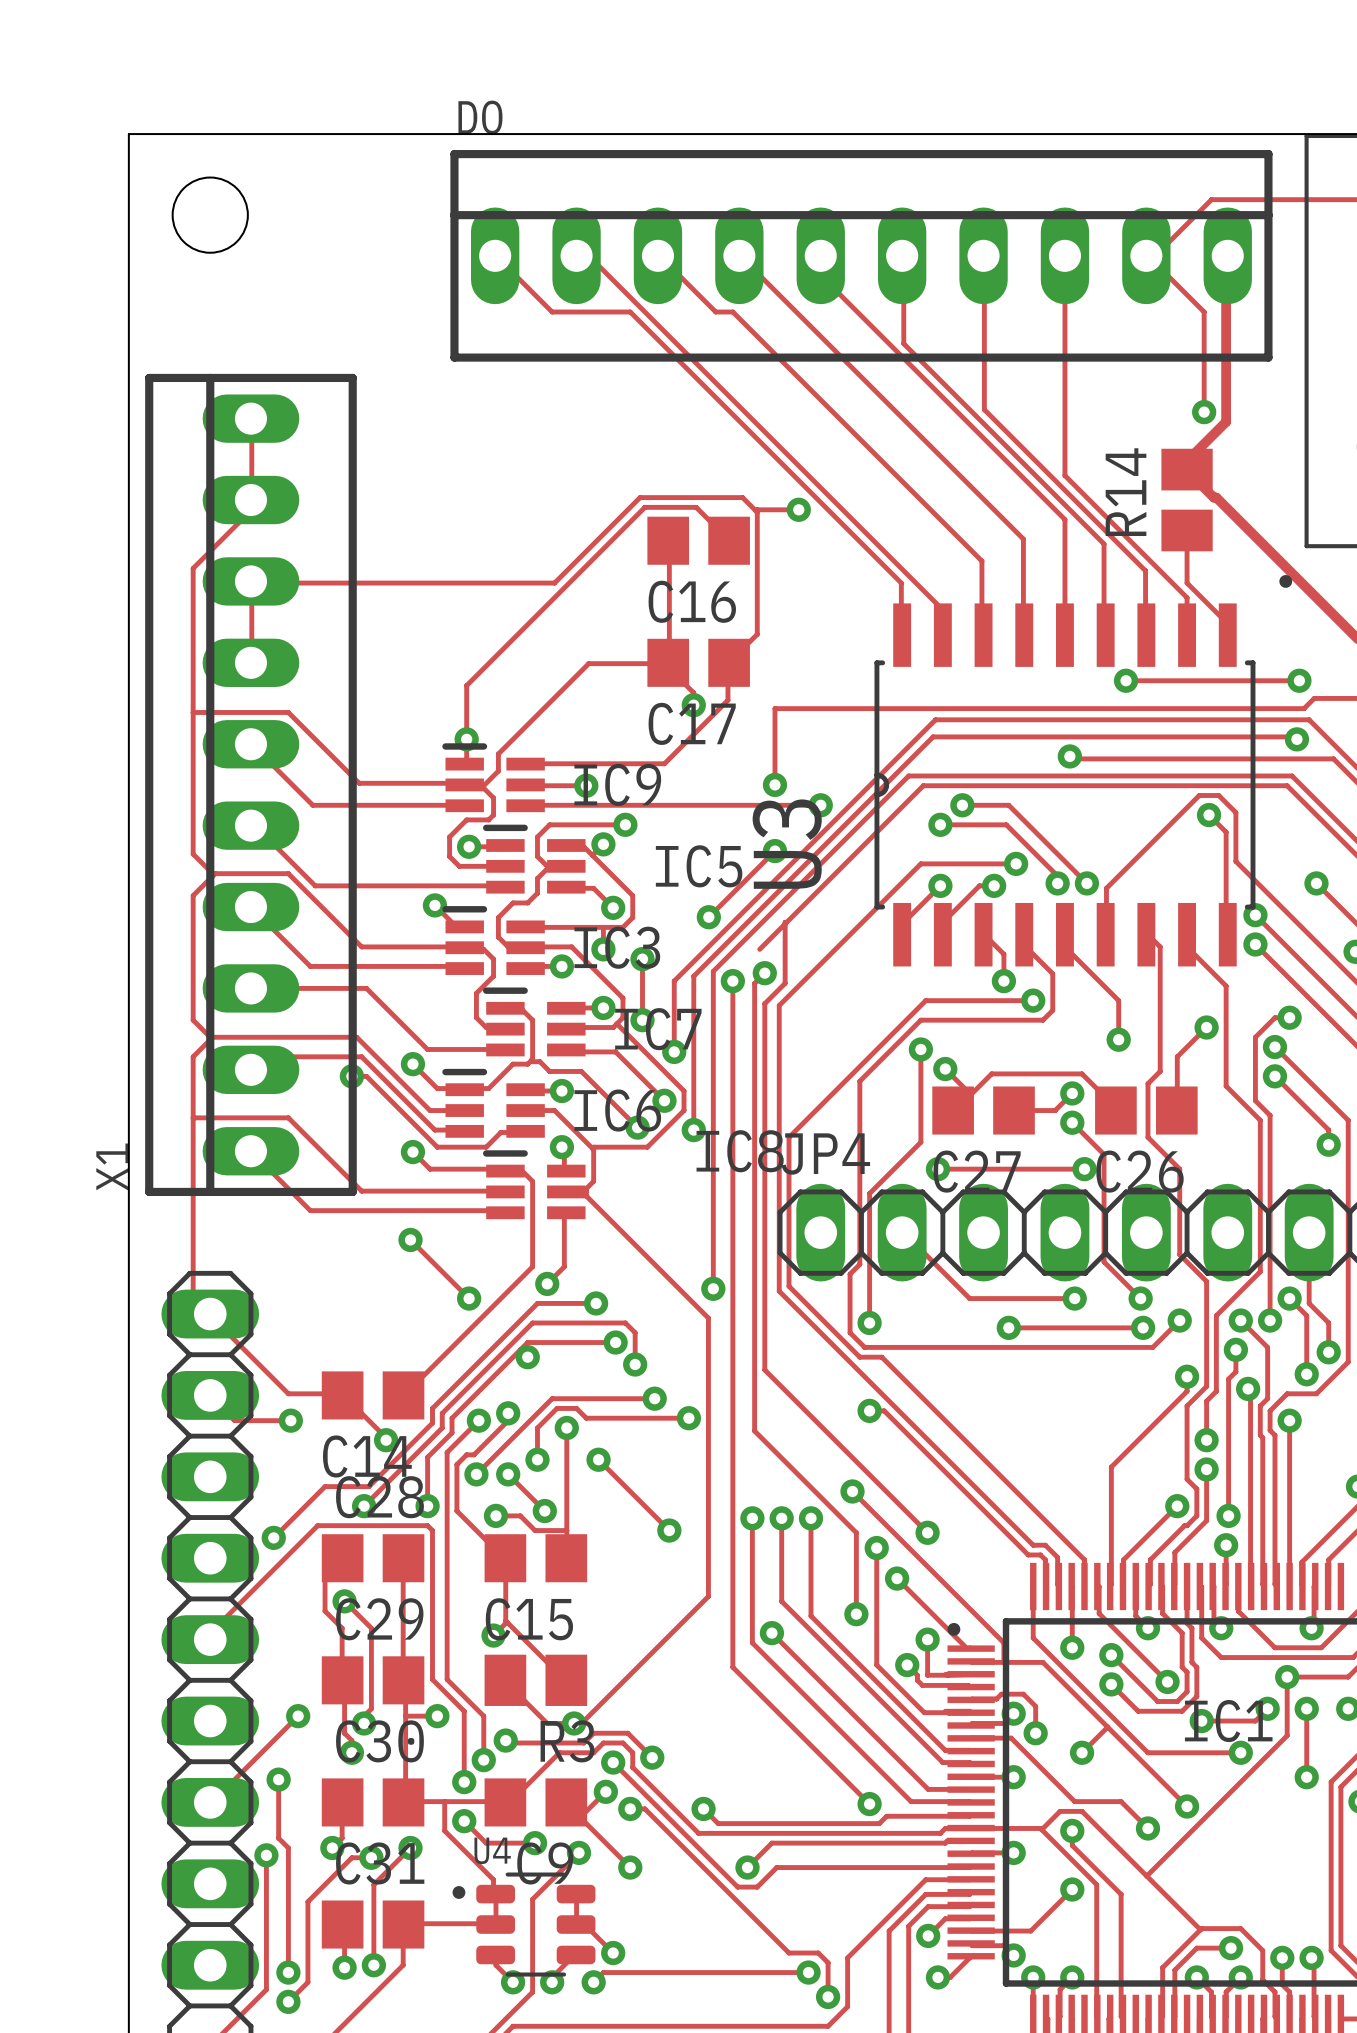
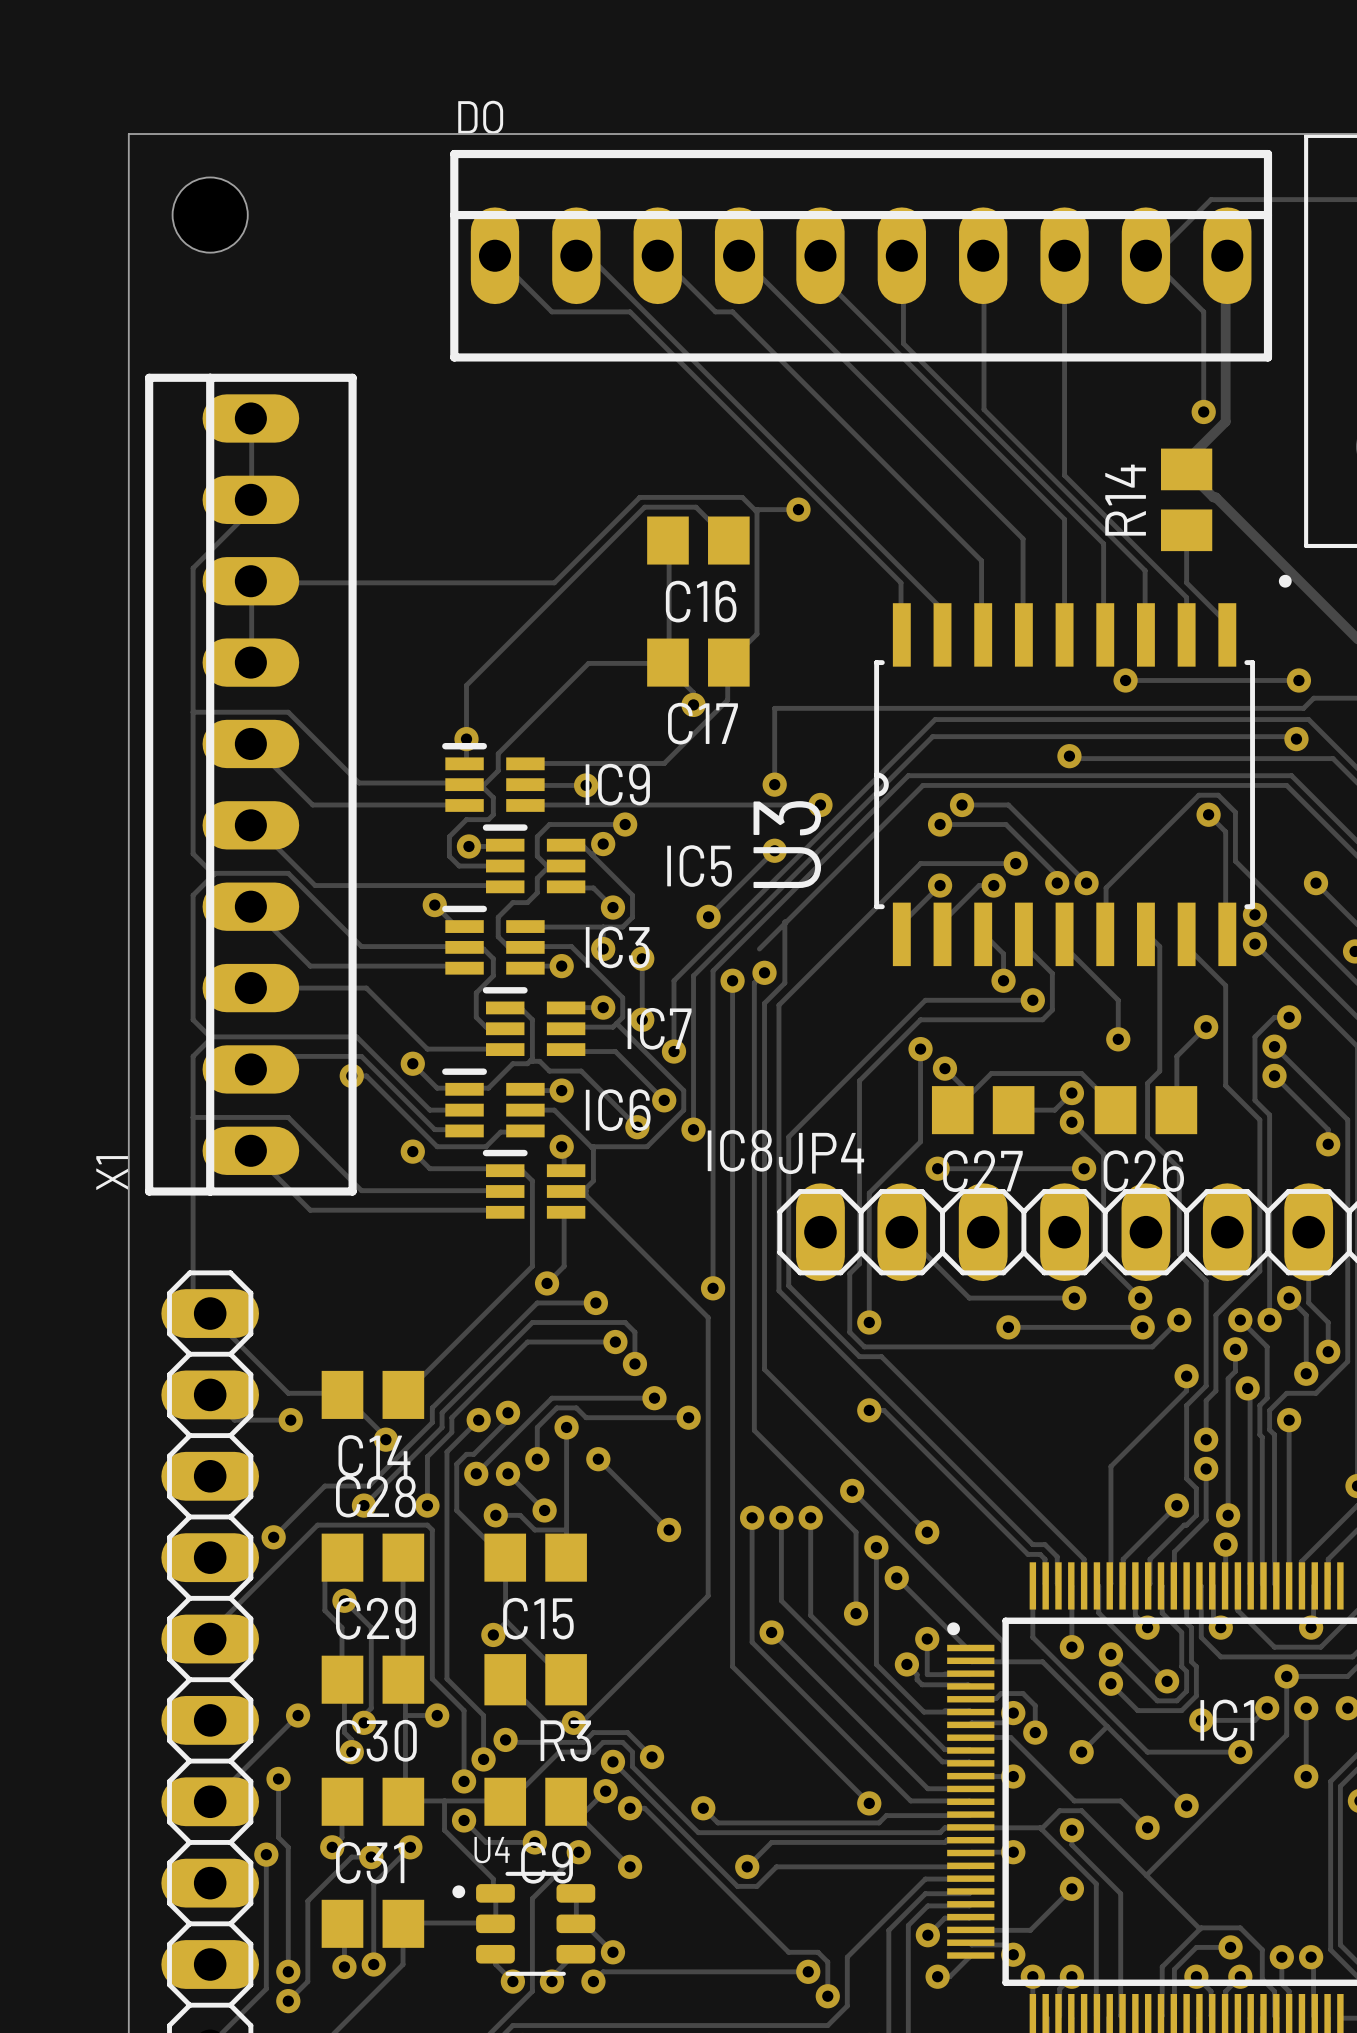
track: (410, 1239) (469, 1298) -> none
via: (410, 1239) -> none
via: (469, 1298) -> none
via: (527, 1357) -> none

